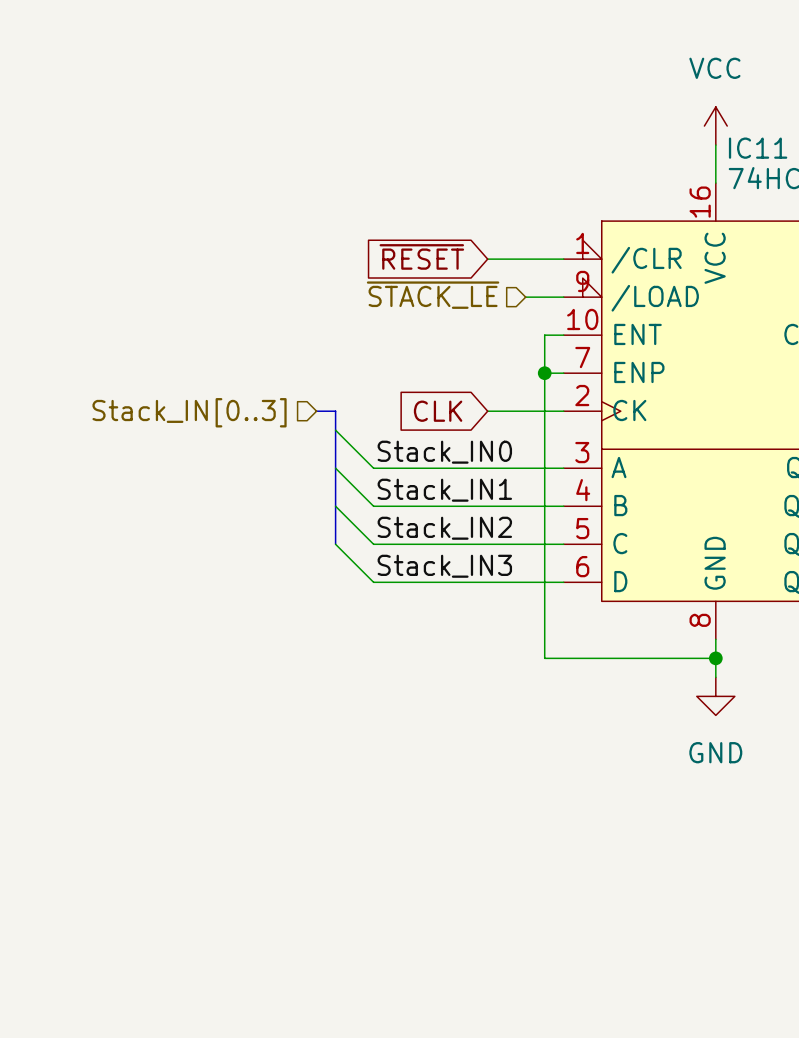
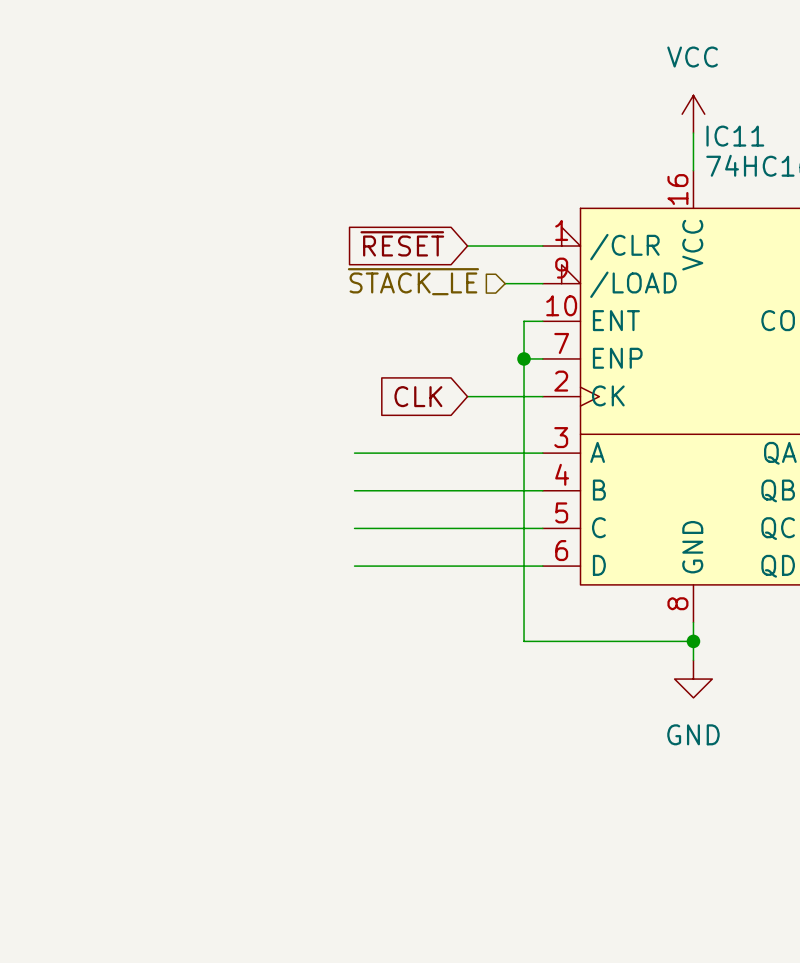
bus: (316, 411) (335, 411) (335, 544) -> none
hierarchical label: Stack_IN[0..3] (189, 412) -> none
wire: (335, 430) (373, 468) -> none
label: Stack_IN0 (444, 452) -> none
wire: (335, 468) (373, 506) -> none
label: Stack_IN1 (444, 490) -> none
wire: (335, 506) (373, 544) -> none
label: Stack_IN2 (444, 528) -> none
wire: (335, 544) (373, 582) -> none
label: Stack_IN3 (444, 566) -> none

